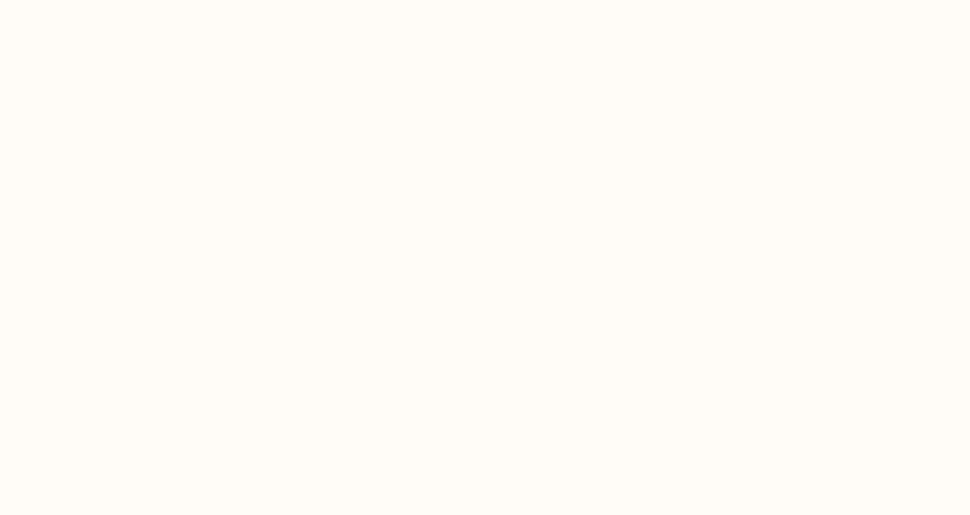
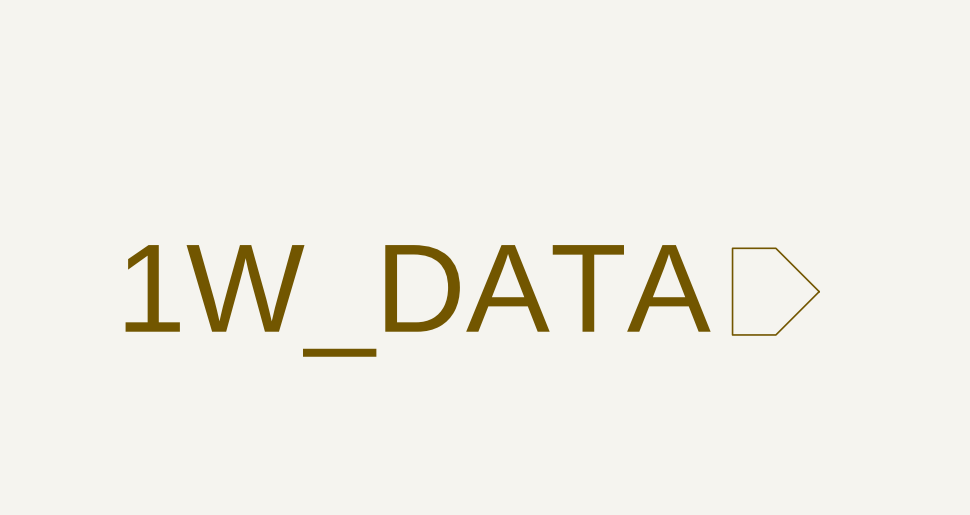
hierarchical label: none -> 1W_DATA (418, 300)

